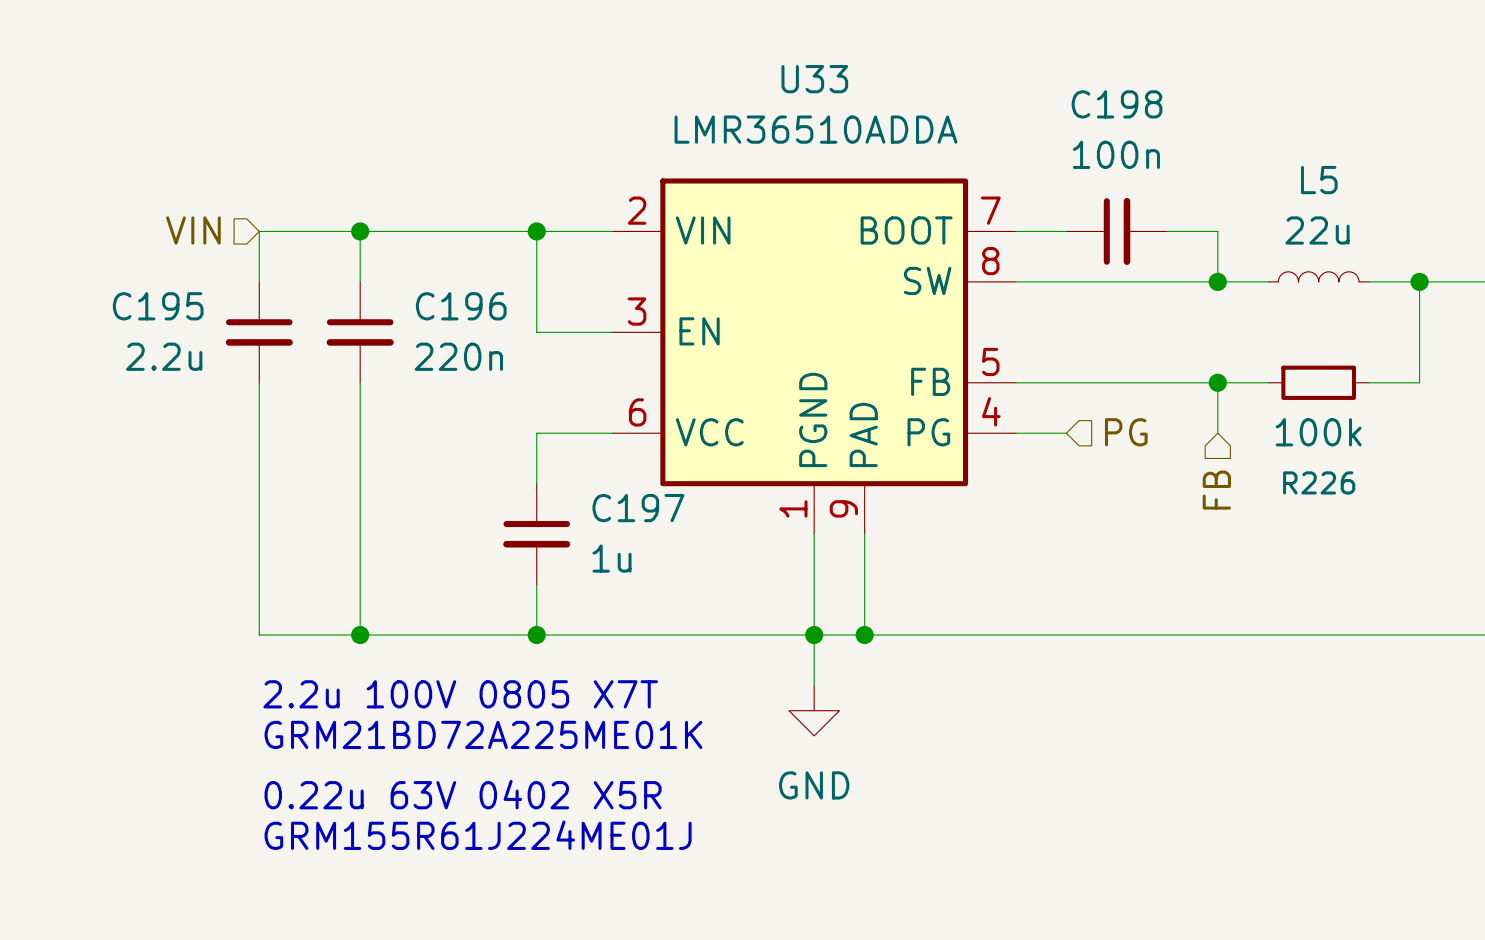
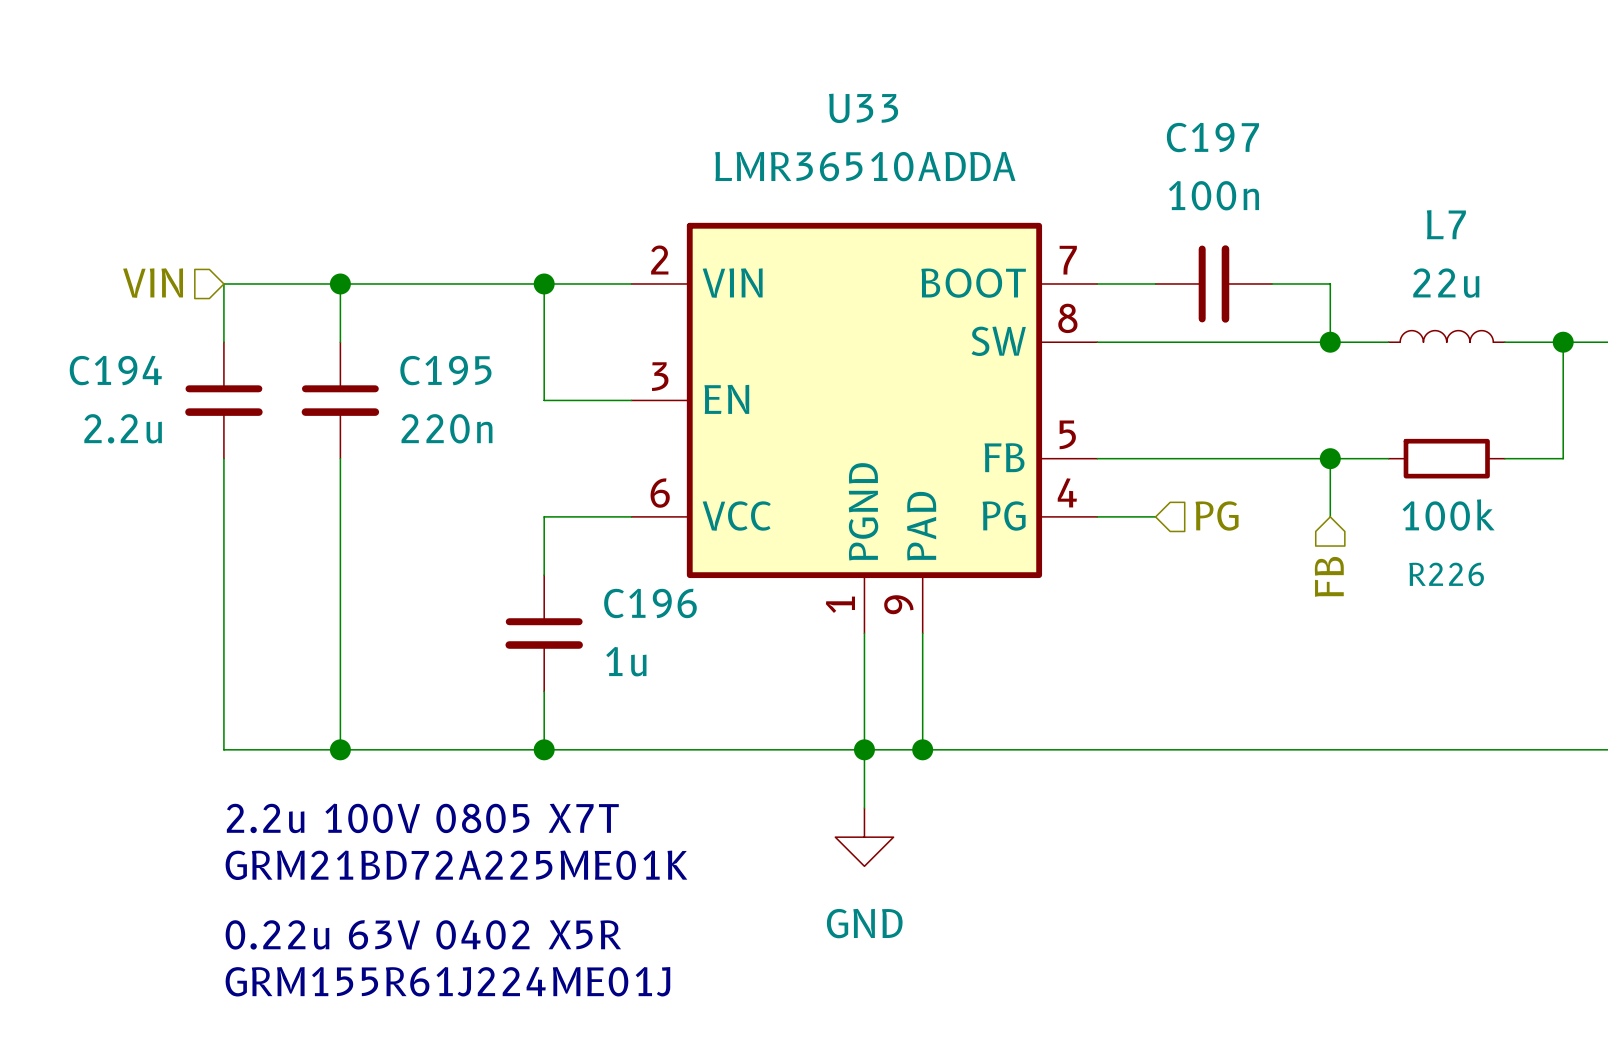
C198 name: C198 (1117, 104) -> C197 (1212, 137)
L5 name: L5 (1319, 180) -> L7 (1446, 224)
C195 name: C195 (158, 306) -> C194 (115, 370)
C196 name: C196 (461, 306) -> C195 (445, 370)
C197 name: C197 (638, 508) -> C196 (650, 603)

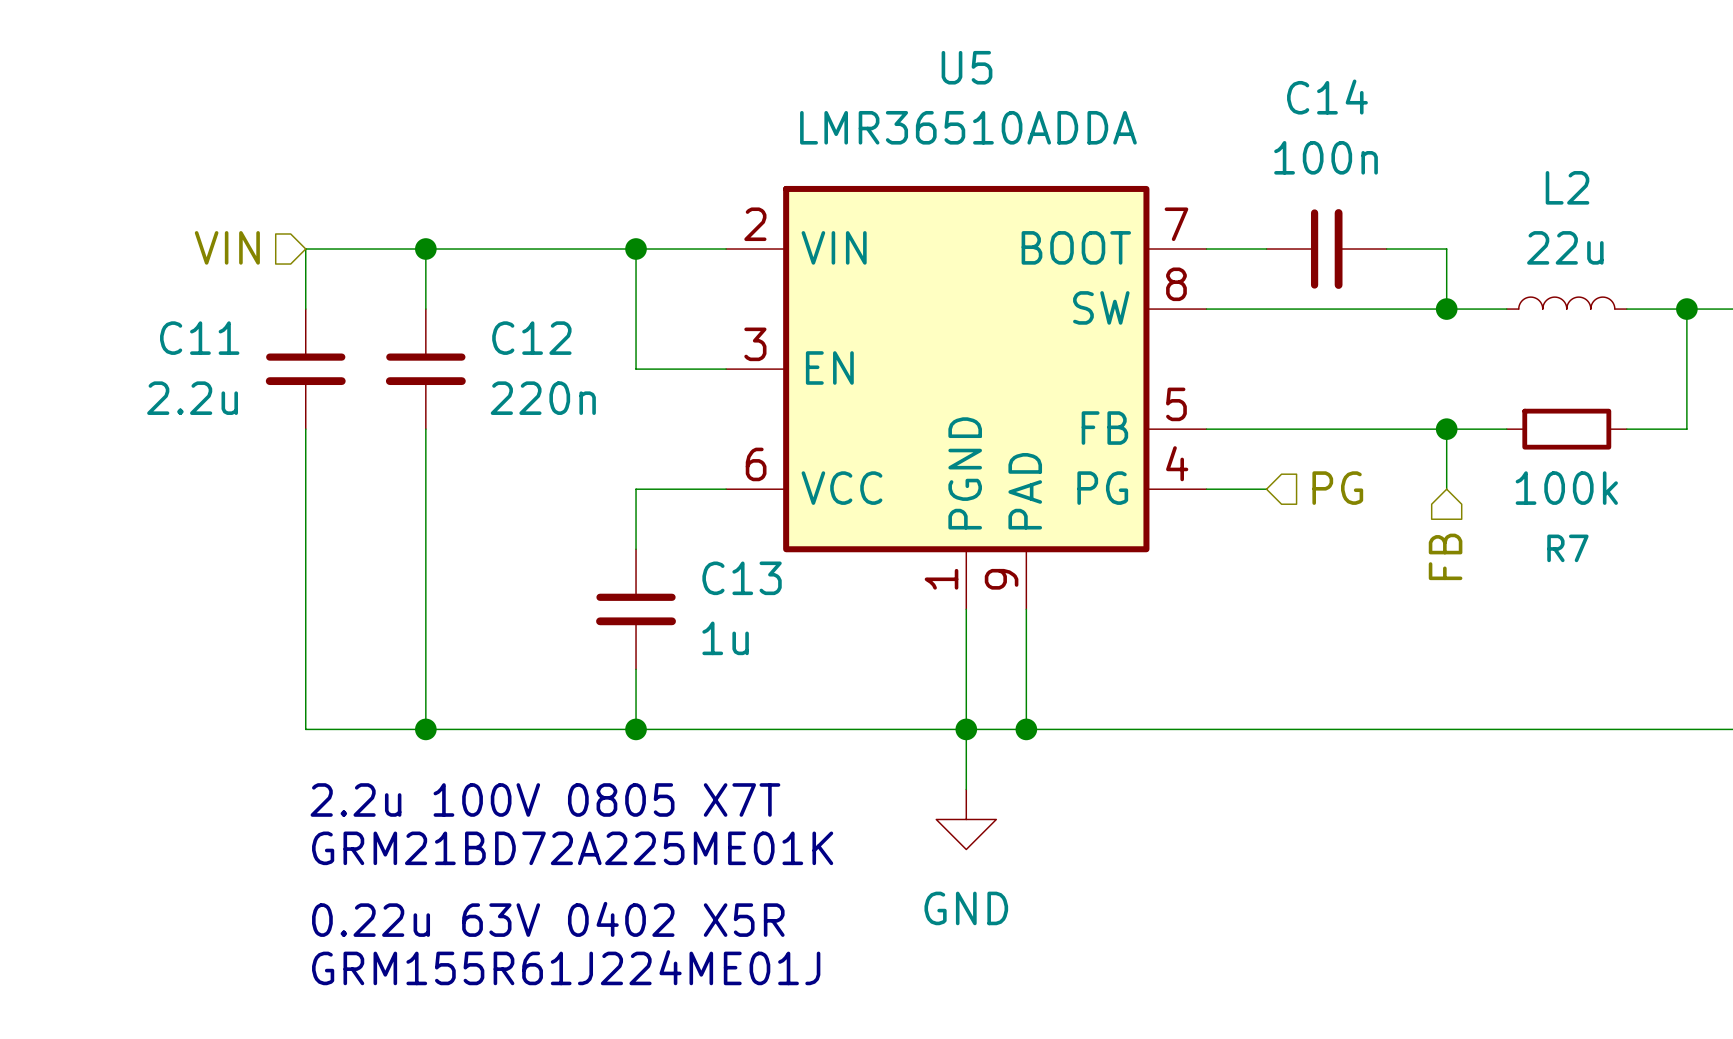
U33 name: U33 (863, 108) -> U5 (967, 67)
C197 name: C197 (1212, 137) -> C14 (1327, 97)
L7 name: L7 (1446, 224) -> L2 (1567, 187)
C194 name: C194 (115, 370) -> C11 (199, 338)
C195 name: C195 (445, 370) -> C12 (531, 338)
R226 name: R226 (1446, 574) -> R7 (1567, 548)
C196 name: C196 (650, 603) -> C13 (742, 578)

